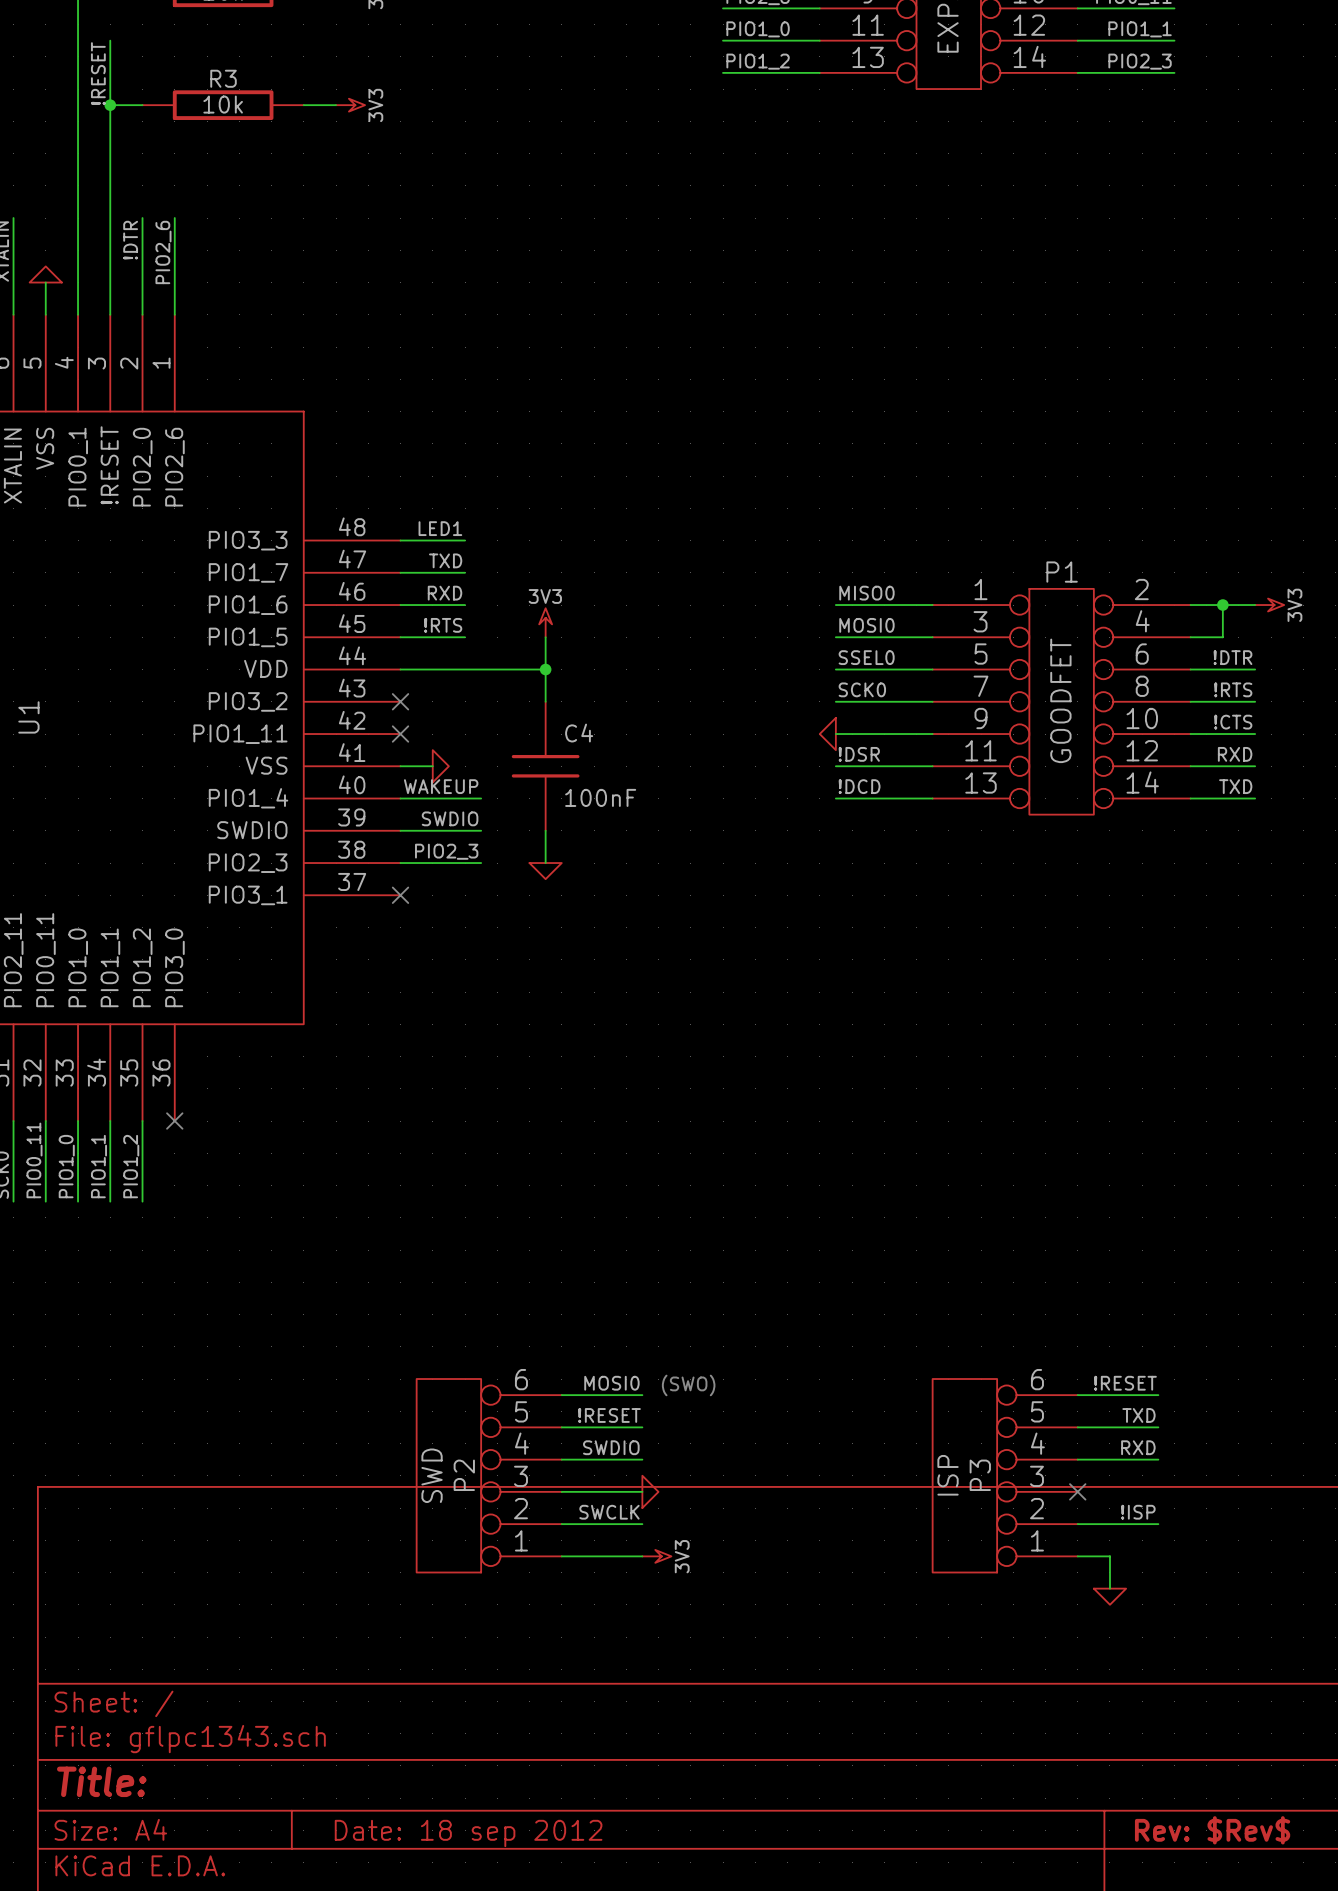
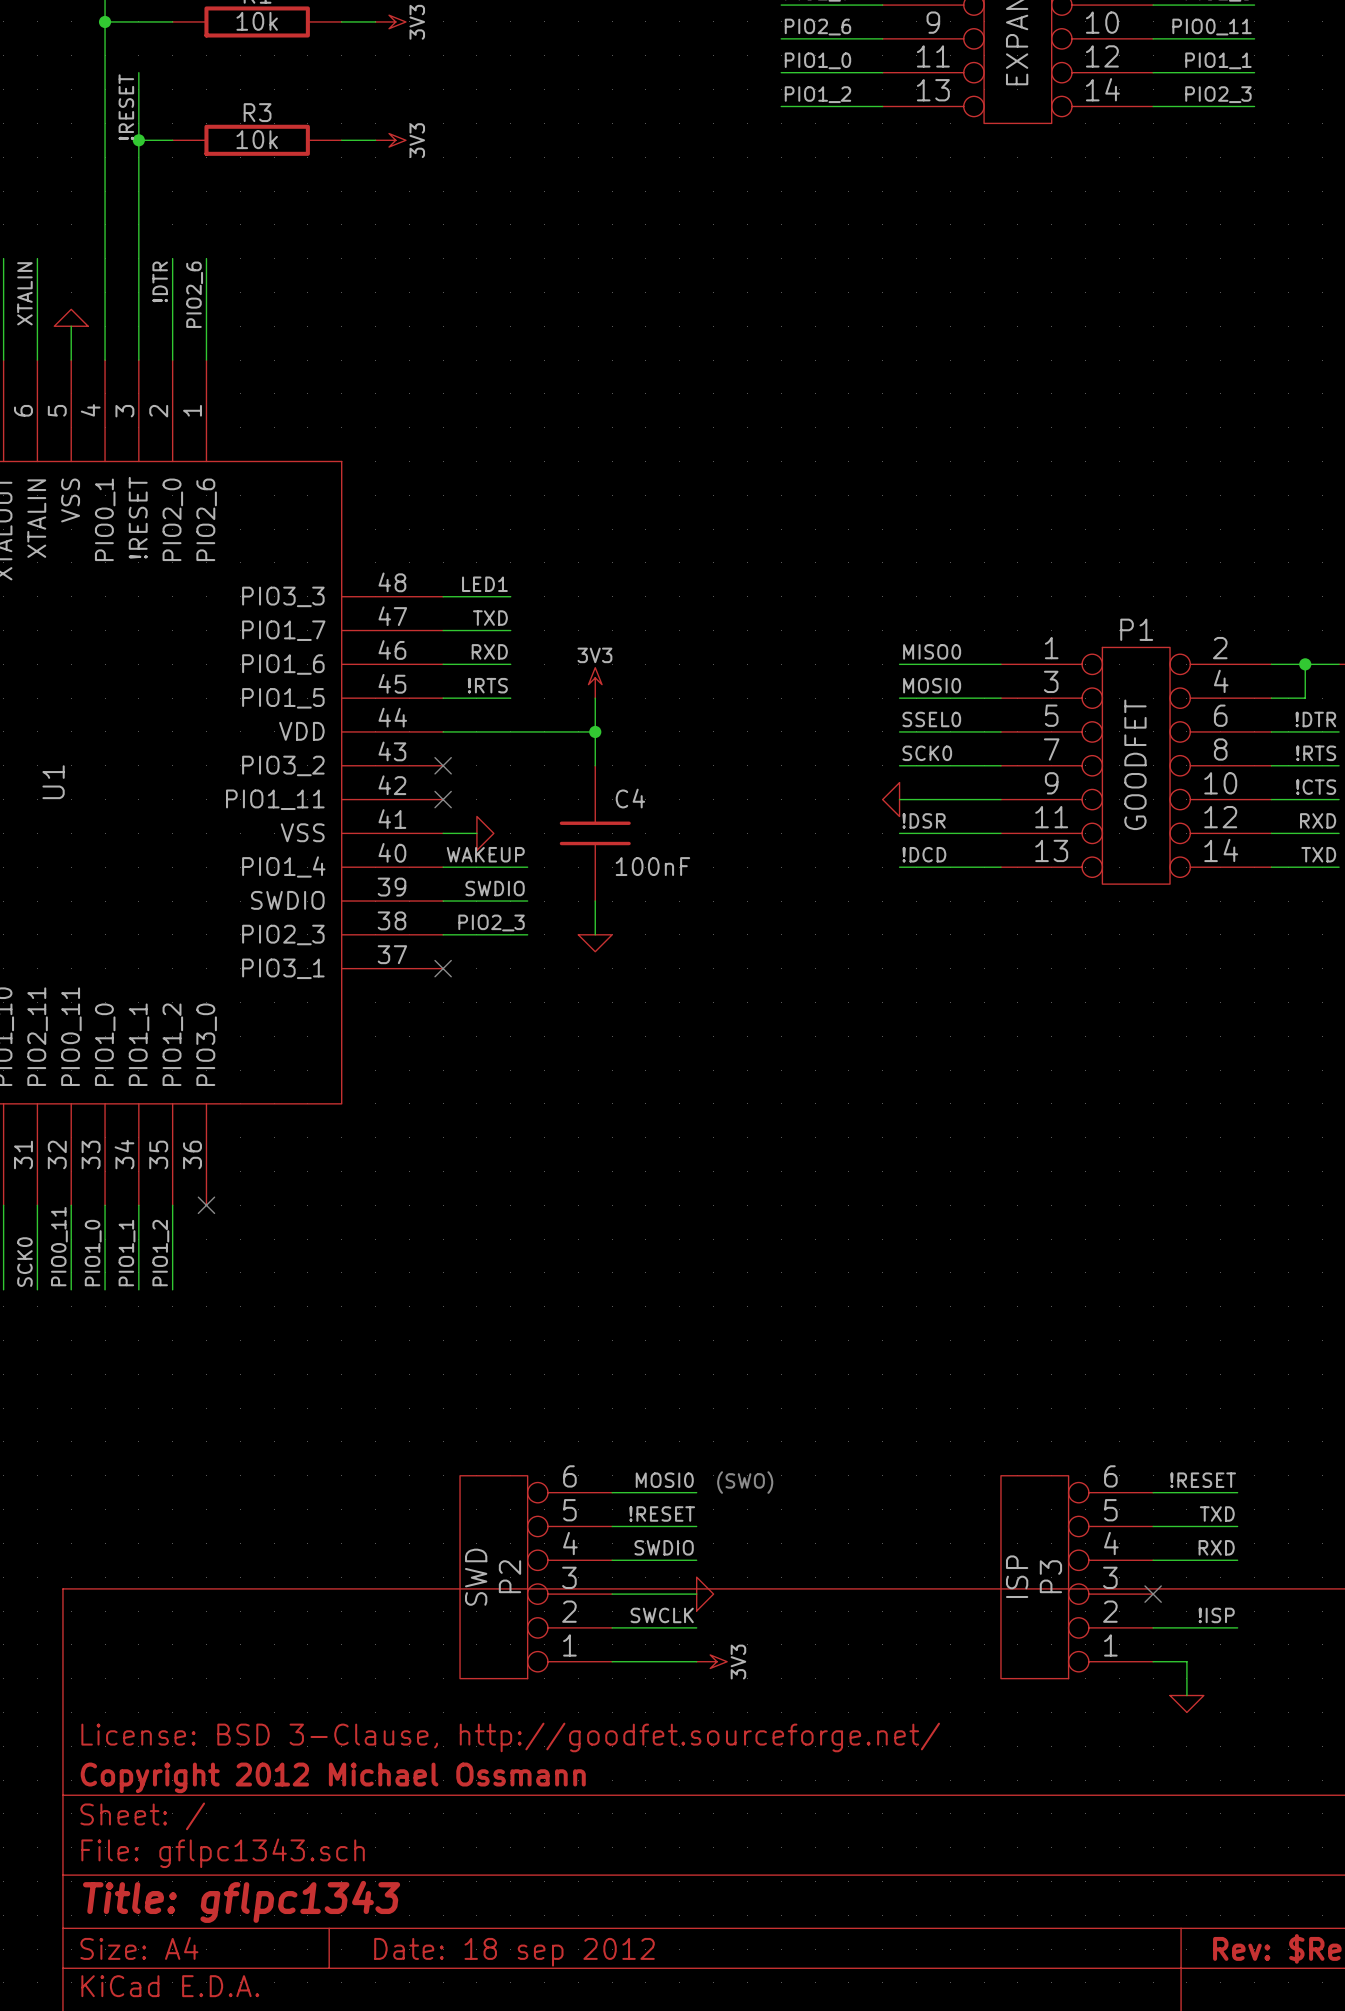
title block: none -> License: BSD 3-Clause, http://goodfet.sourceforge.net/ (510, 1737)
title block: none -> Copyright 2012 Michael Ossmann (333, 1777)
title block: Title: (101, 1781) -> Title: gflpc1343 (241, 1901)

